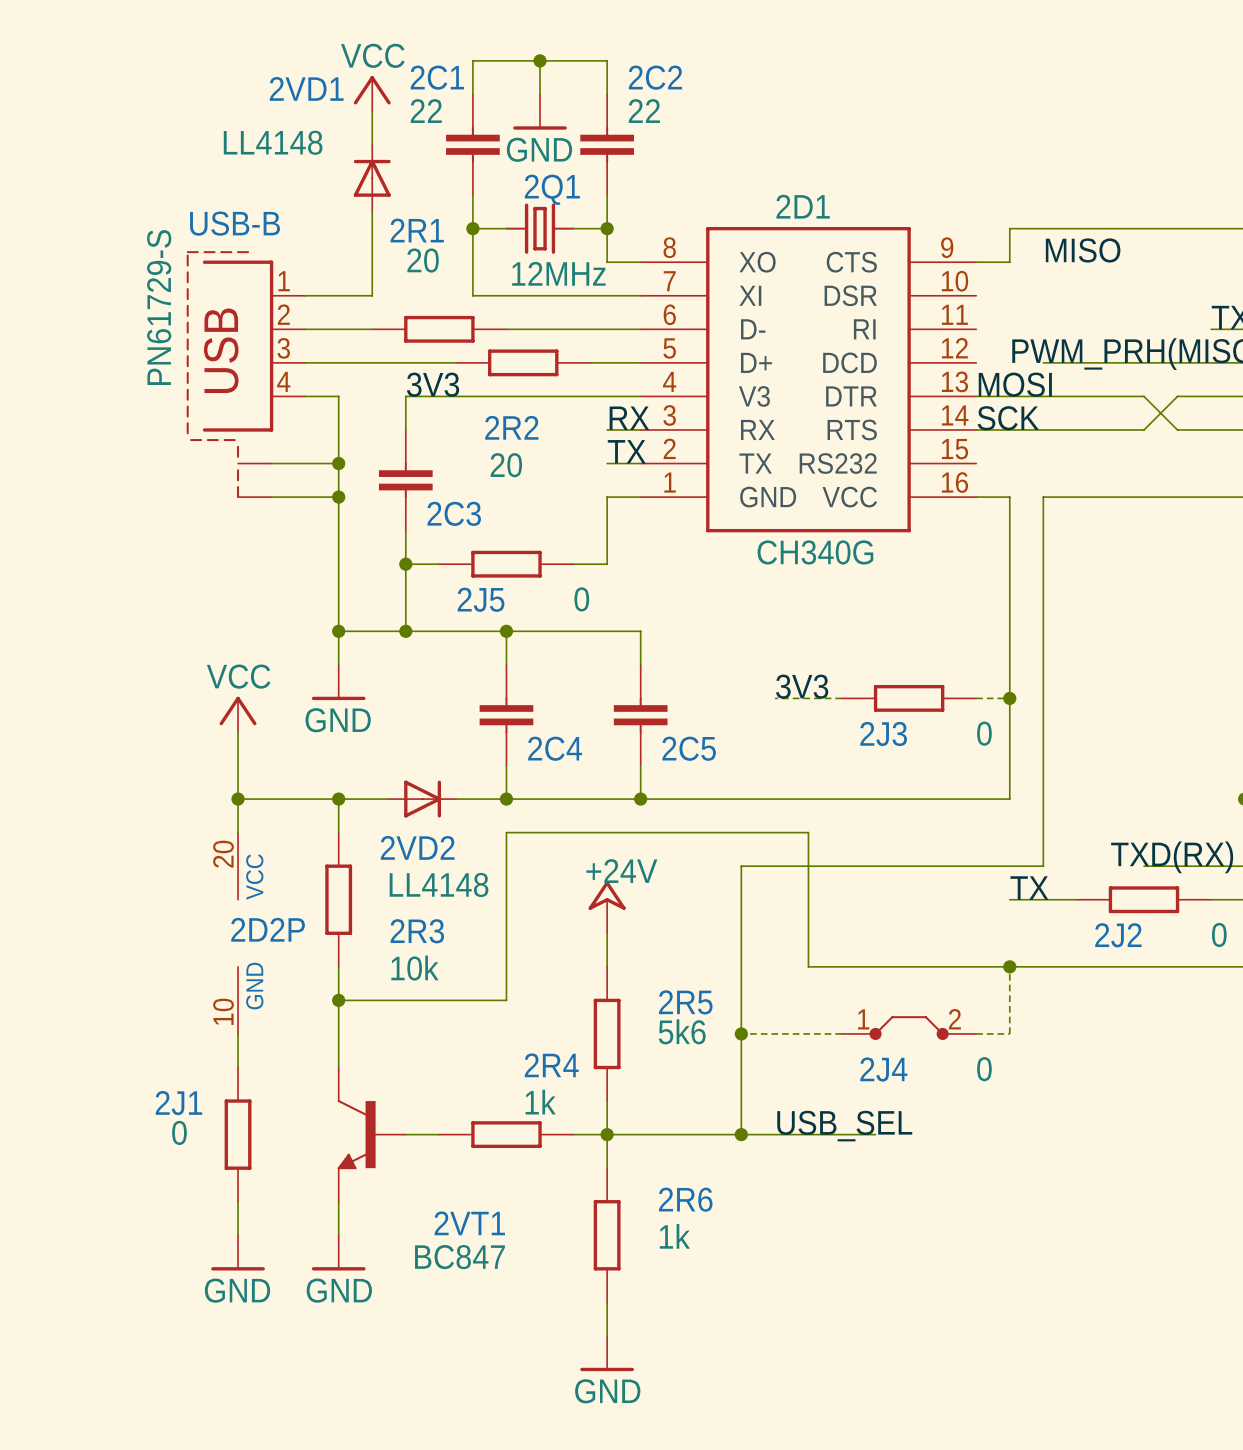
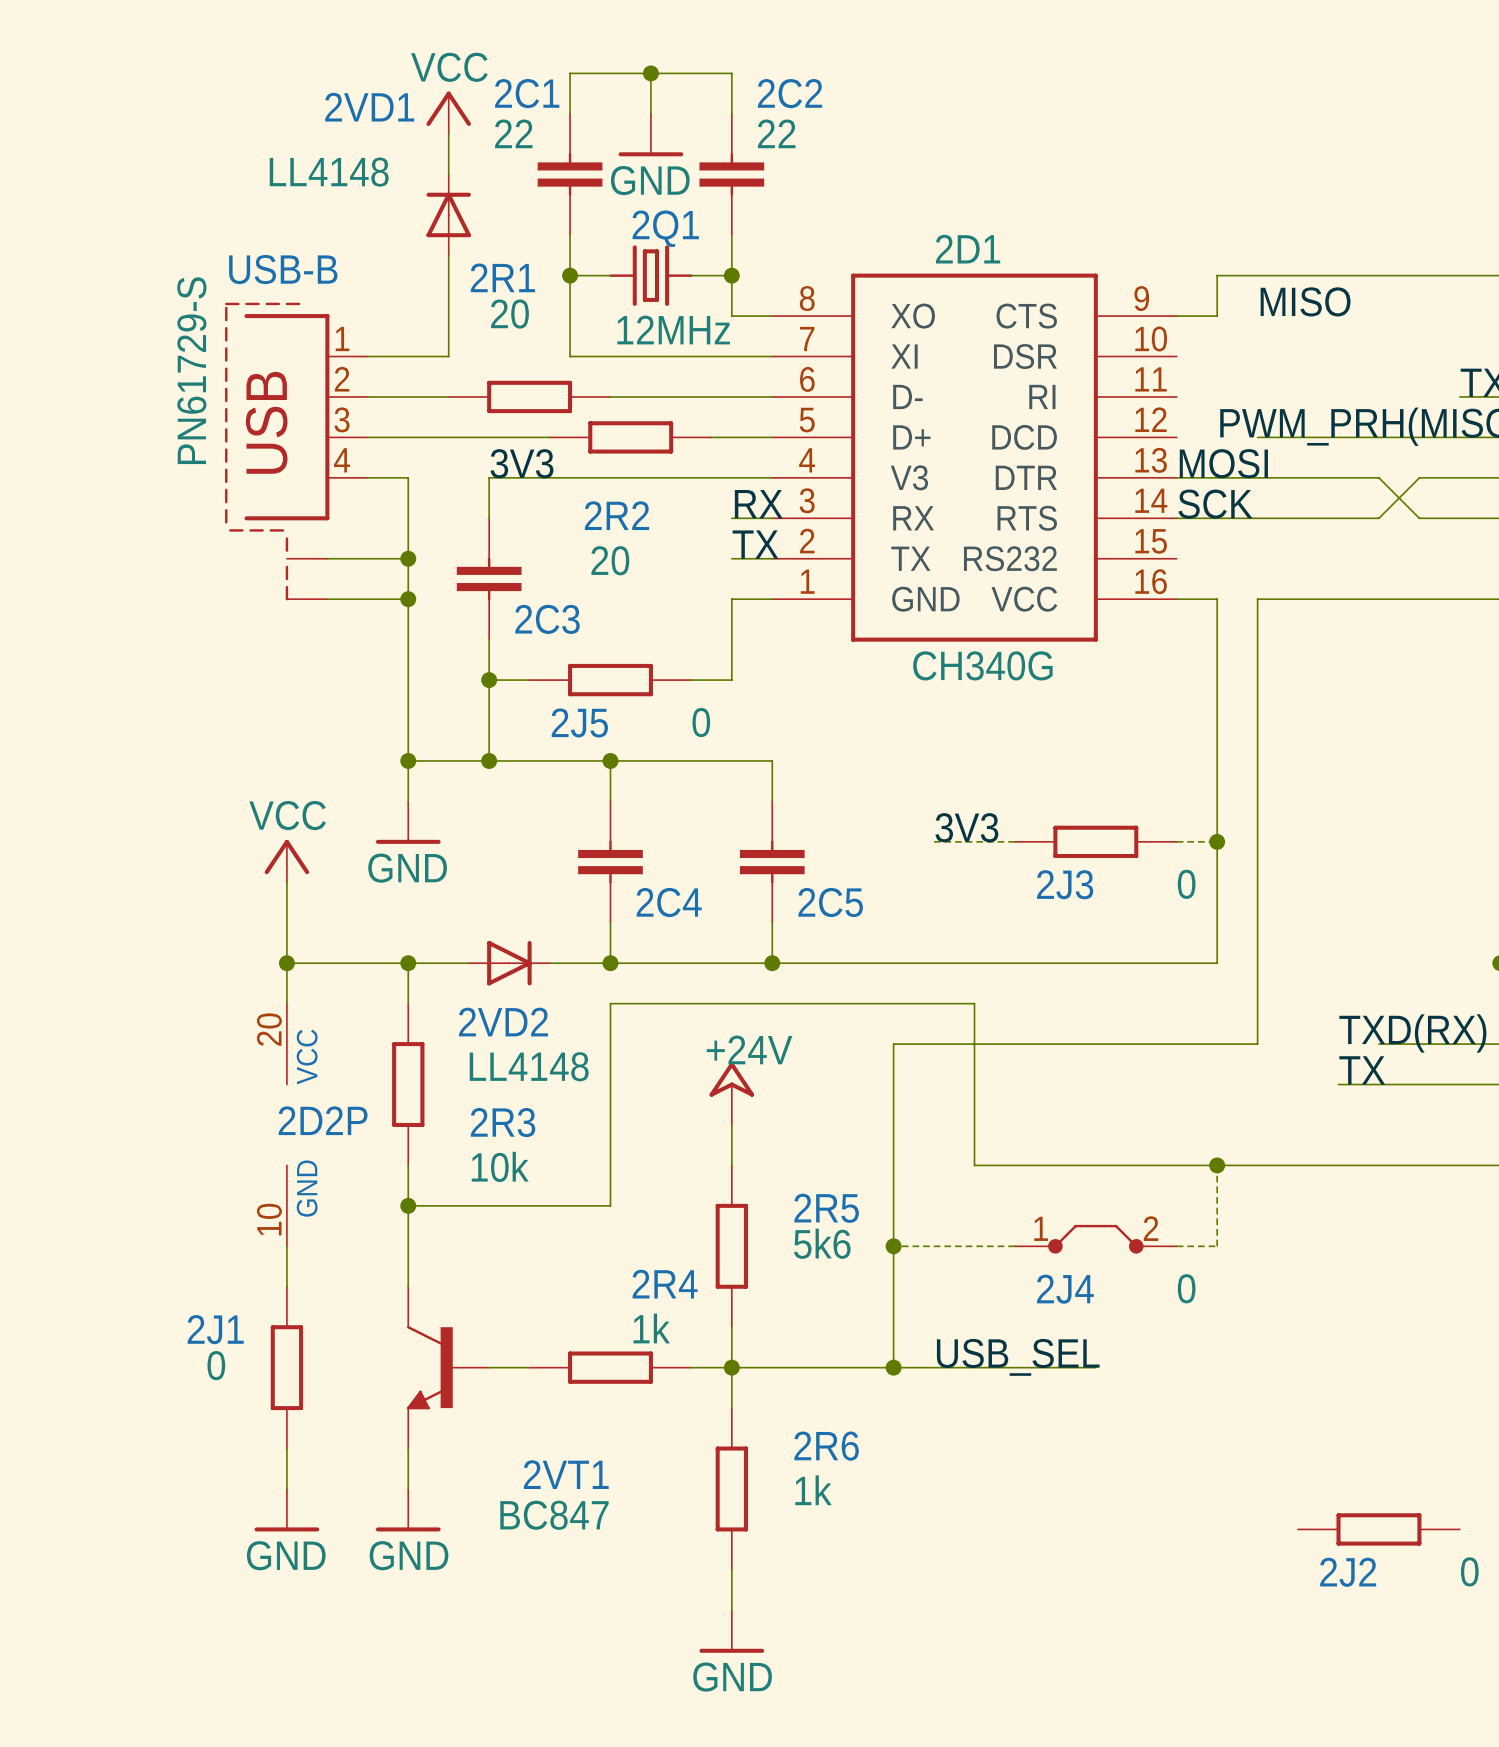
label position: TX (1029, 887) -> TX (1362, 1070)
wire: (1009, 899) (1076, 899) -> none
wire: none -> (1338, 1084) (1459, 1084)
2J2 position: (1143, 899) -> (1378, 1529)
wire: none -> (1055, 1367) (1095, 1367)

